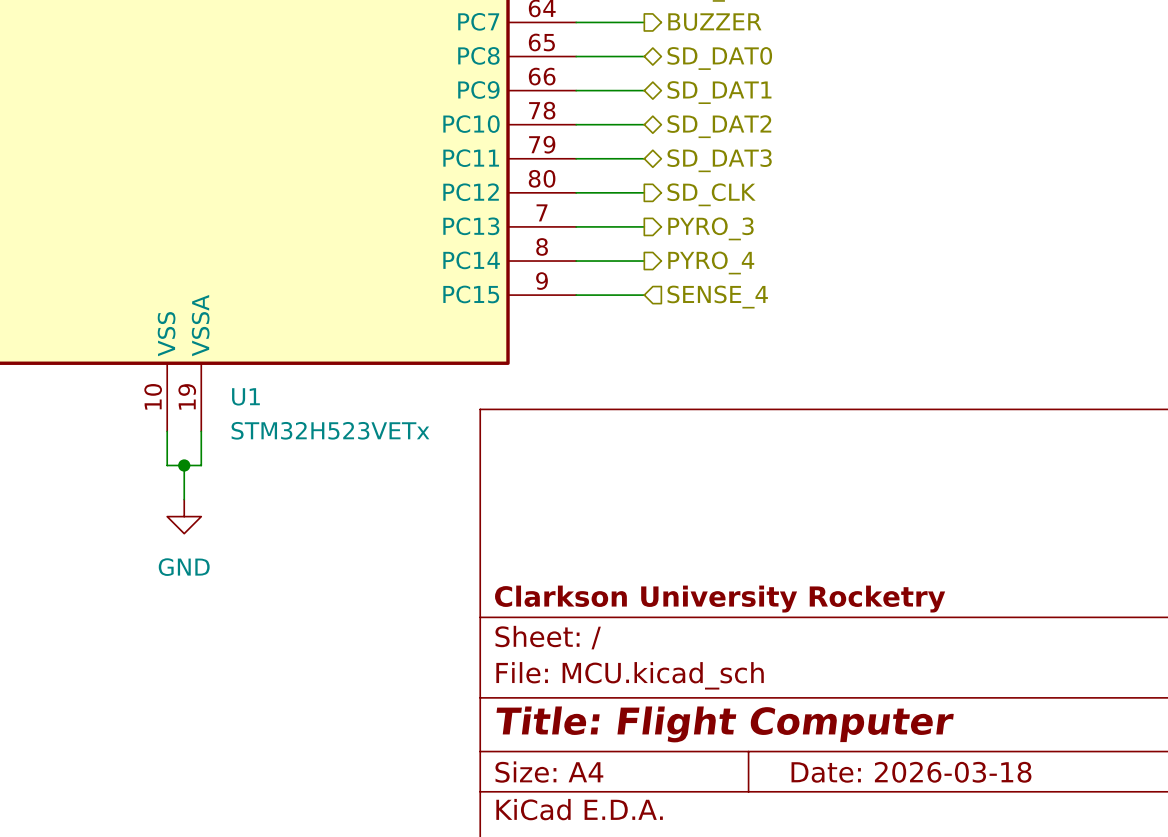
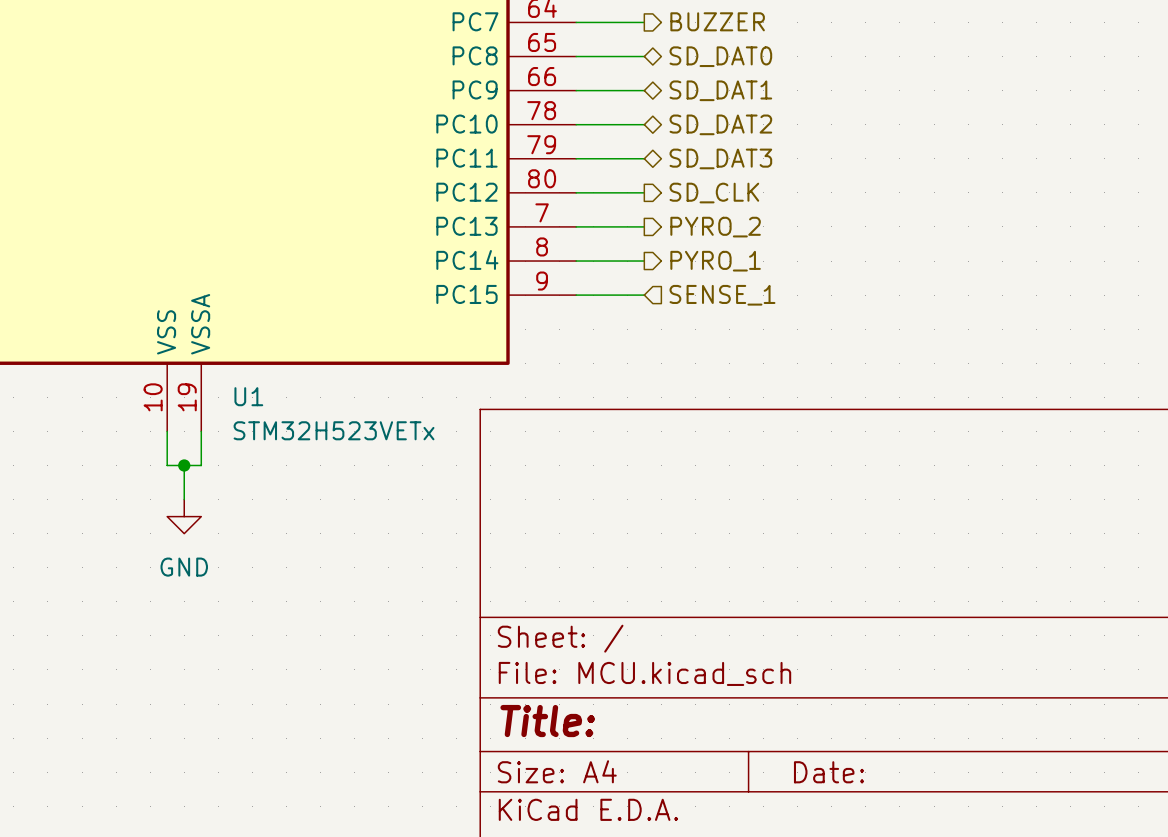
hierarchical label: PYRO_3 (710, 228) -> PYRO_2 (715, 227)
hierarchical label: PYRO_4 (711, 262) -> PYRO_1 (715, 261)
hierarchical label: SENSE_4 (717, 297) -> SENSE_1 (722, 295)
title block: Clarkson University Rocketry (720, 599) -> none
title block: Title: Flight Computer (725, 724) -> Title: (547, 721)
title block: Date: 2026-03-18 (911, 772) -> Date: (828, 772)

